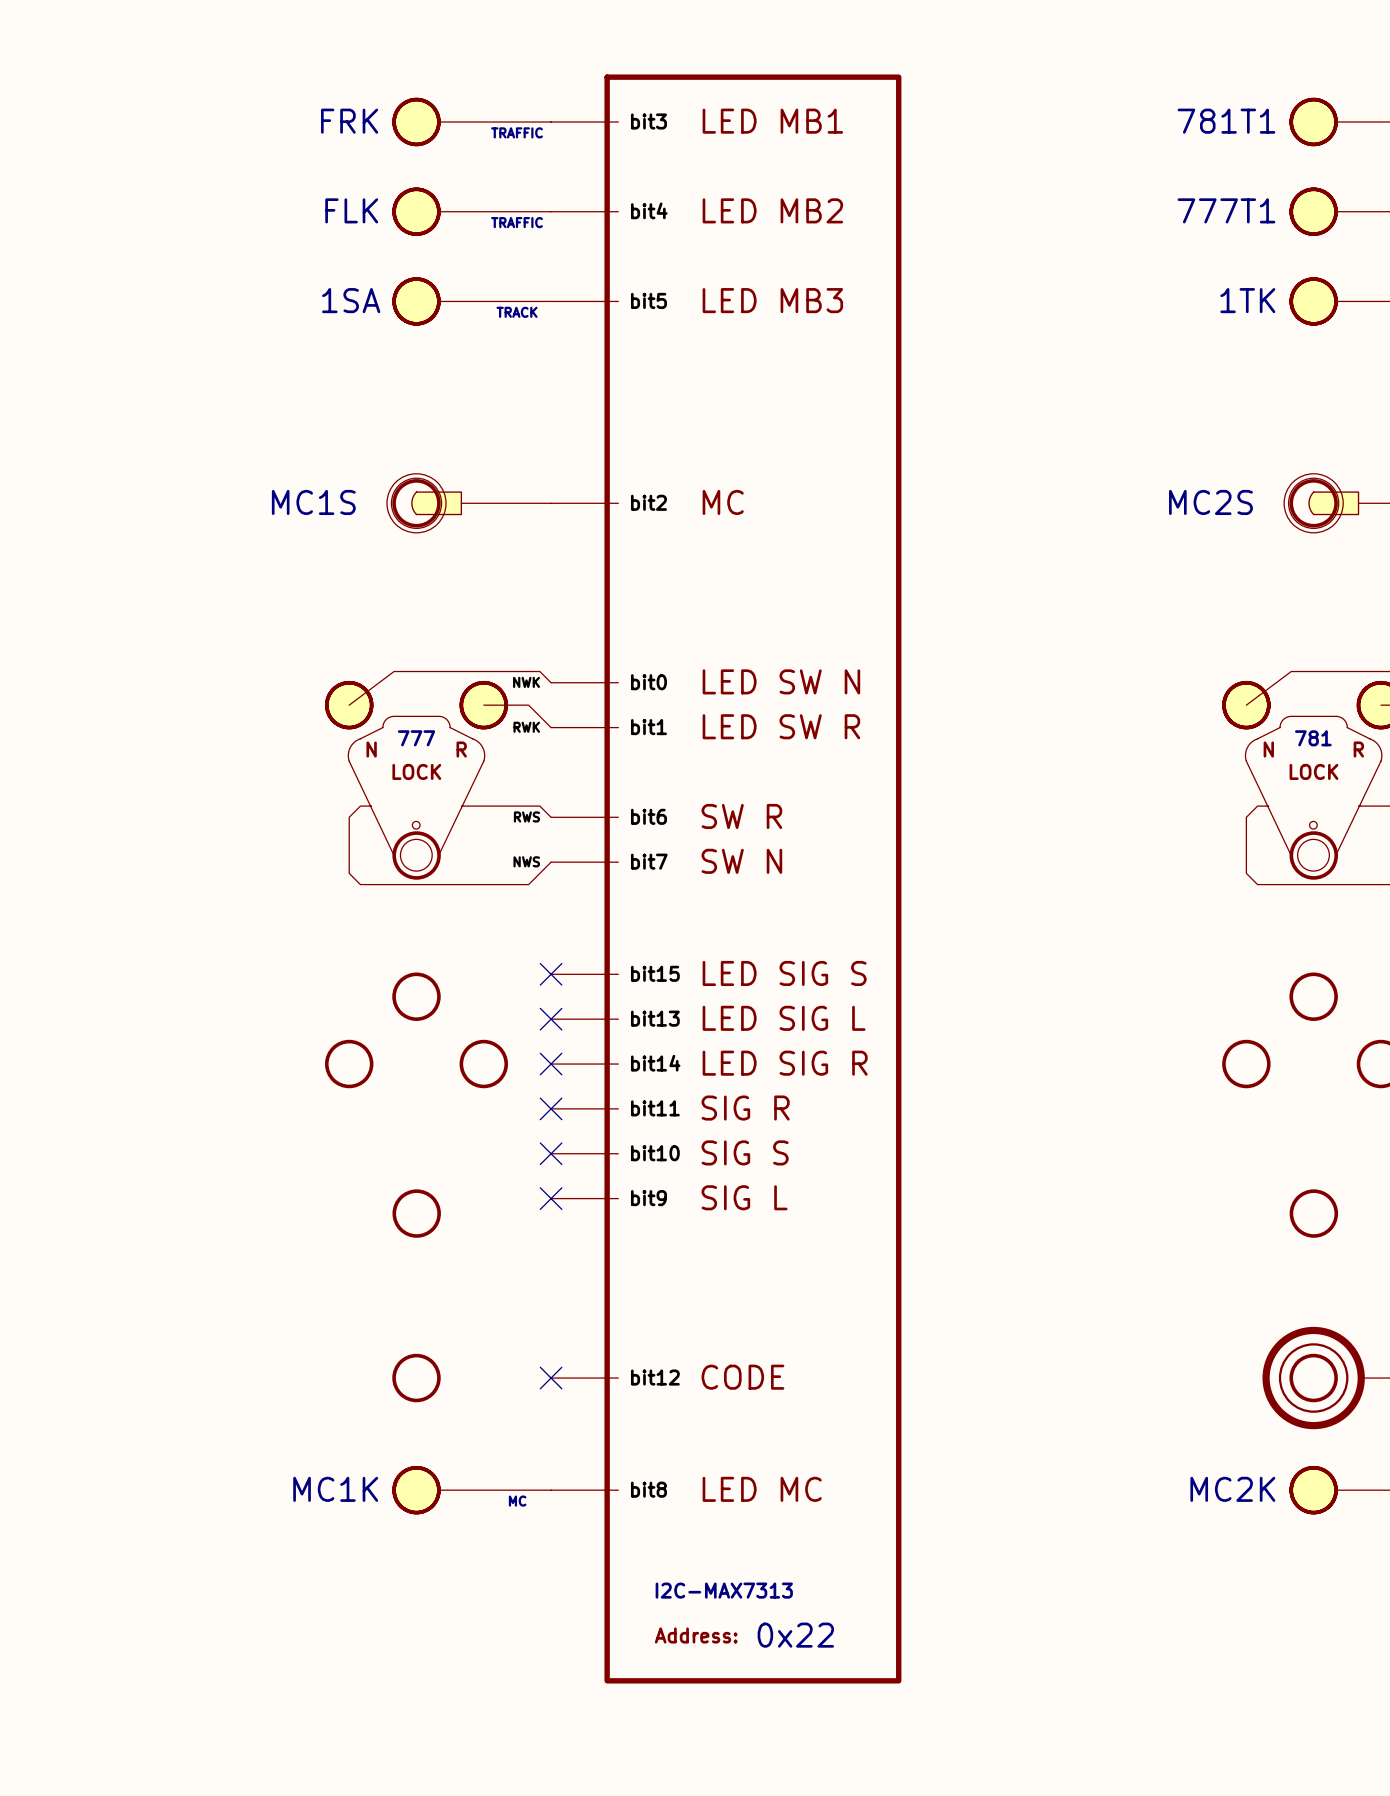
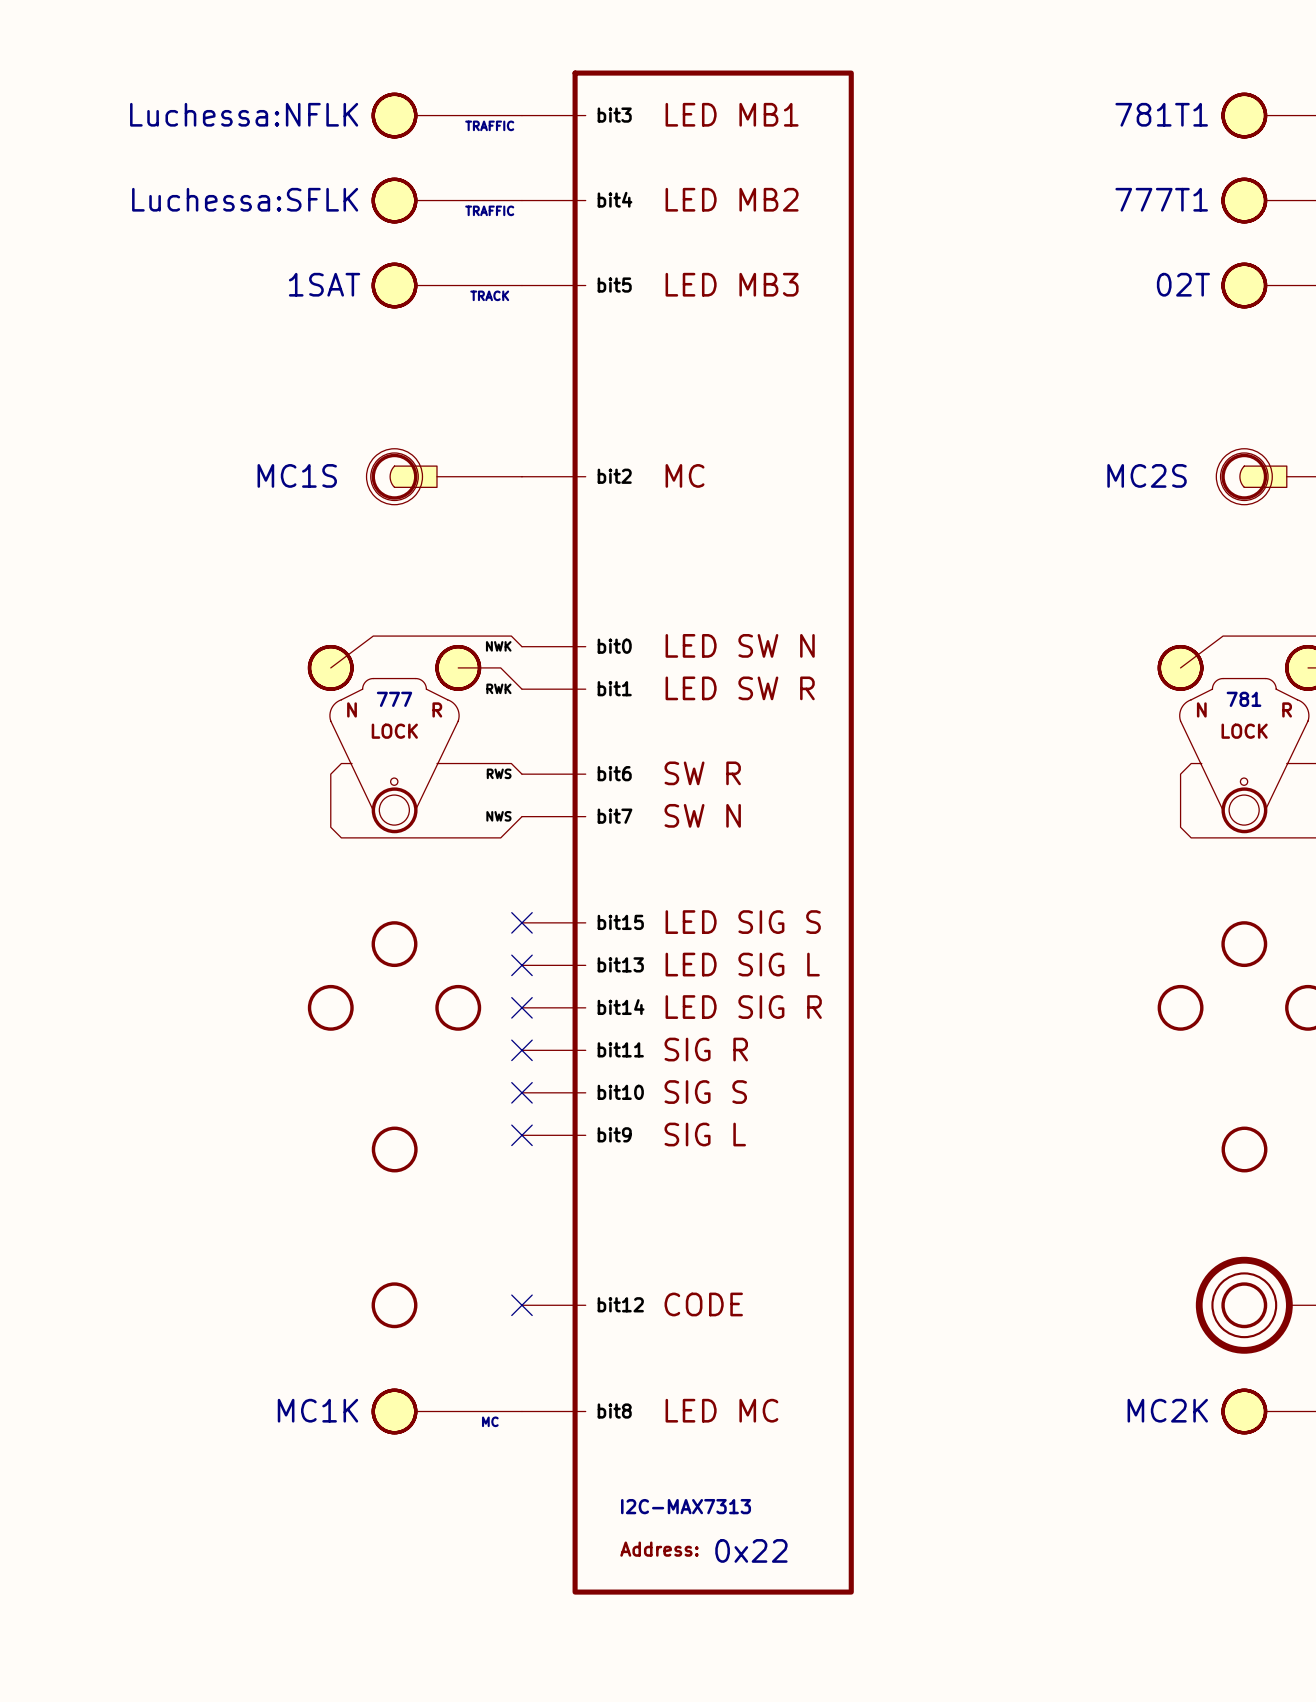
part text: FRK (349, 121) -> Luchessa:NFLK (244, 114)
part text: FLK (351, 210) -> Luchessa:SFLK (245, 199)
part text: 1SA (351, 300) -> 1SAT (324, 284)
part text: 1TK (1247, 300) -> 02T (1183, 284)
part value: 0x22 (795, 1635) -> none
part text: none -> 0x22 (751, 1550)

